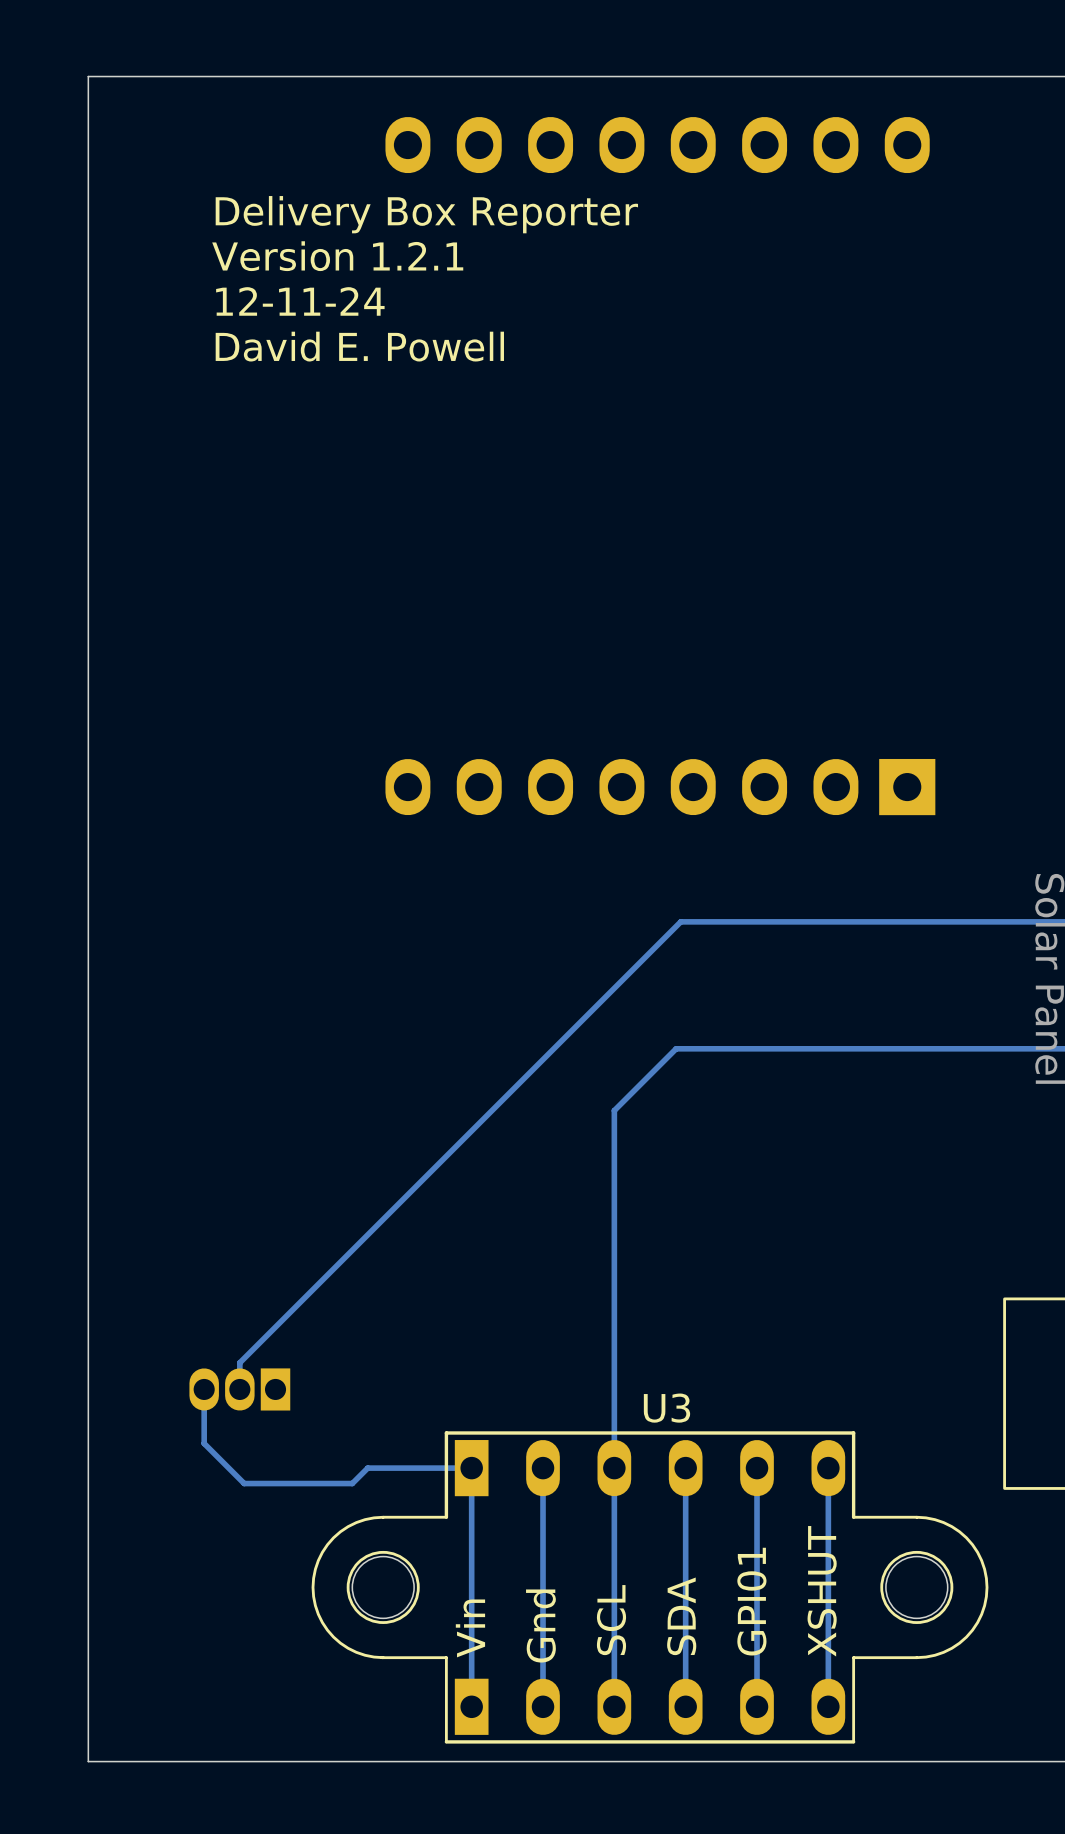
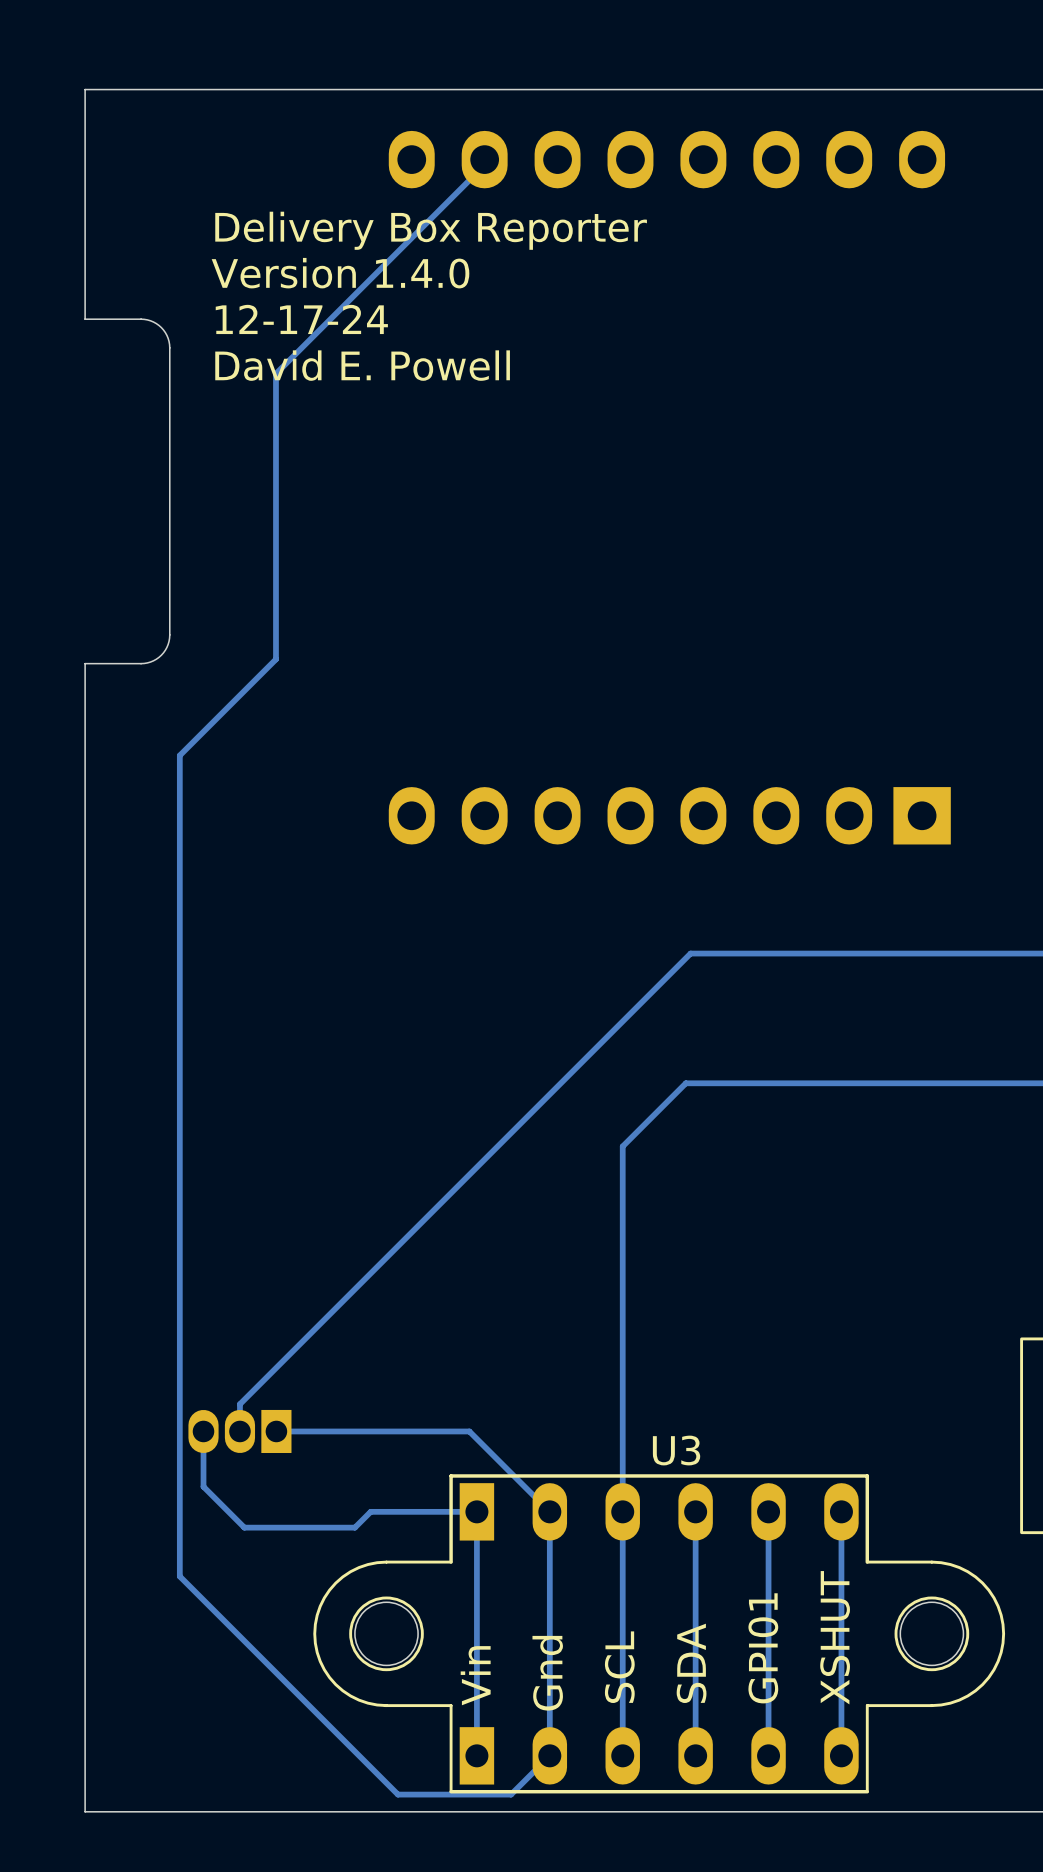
track: none -> (484, 159) (484, 165) (275, 373) (275, 659) (179, 755) (179, 1576) (397, 1794) (511, 1794) (549, 1755)
text: Version 1.2.1 (337, 256) -> Version 1.4.0 (340, 273)
board edge: (88, 301) (88, 638) -> (85, 319) (150, 320) (158, 325) (165, 332) (169, 347) (169, 641) (161, 655) (147, 662) (85, 663)
text: 12-11-24 (300, 301) -> 12-17-24 (301, 319)
track: none -> (276, 1431) (469, 1431) (549, 1511)

